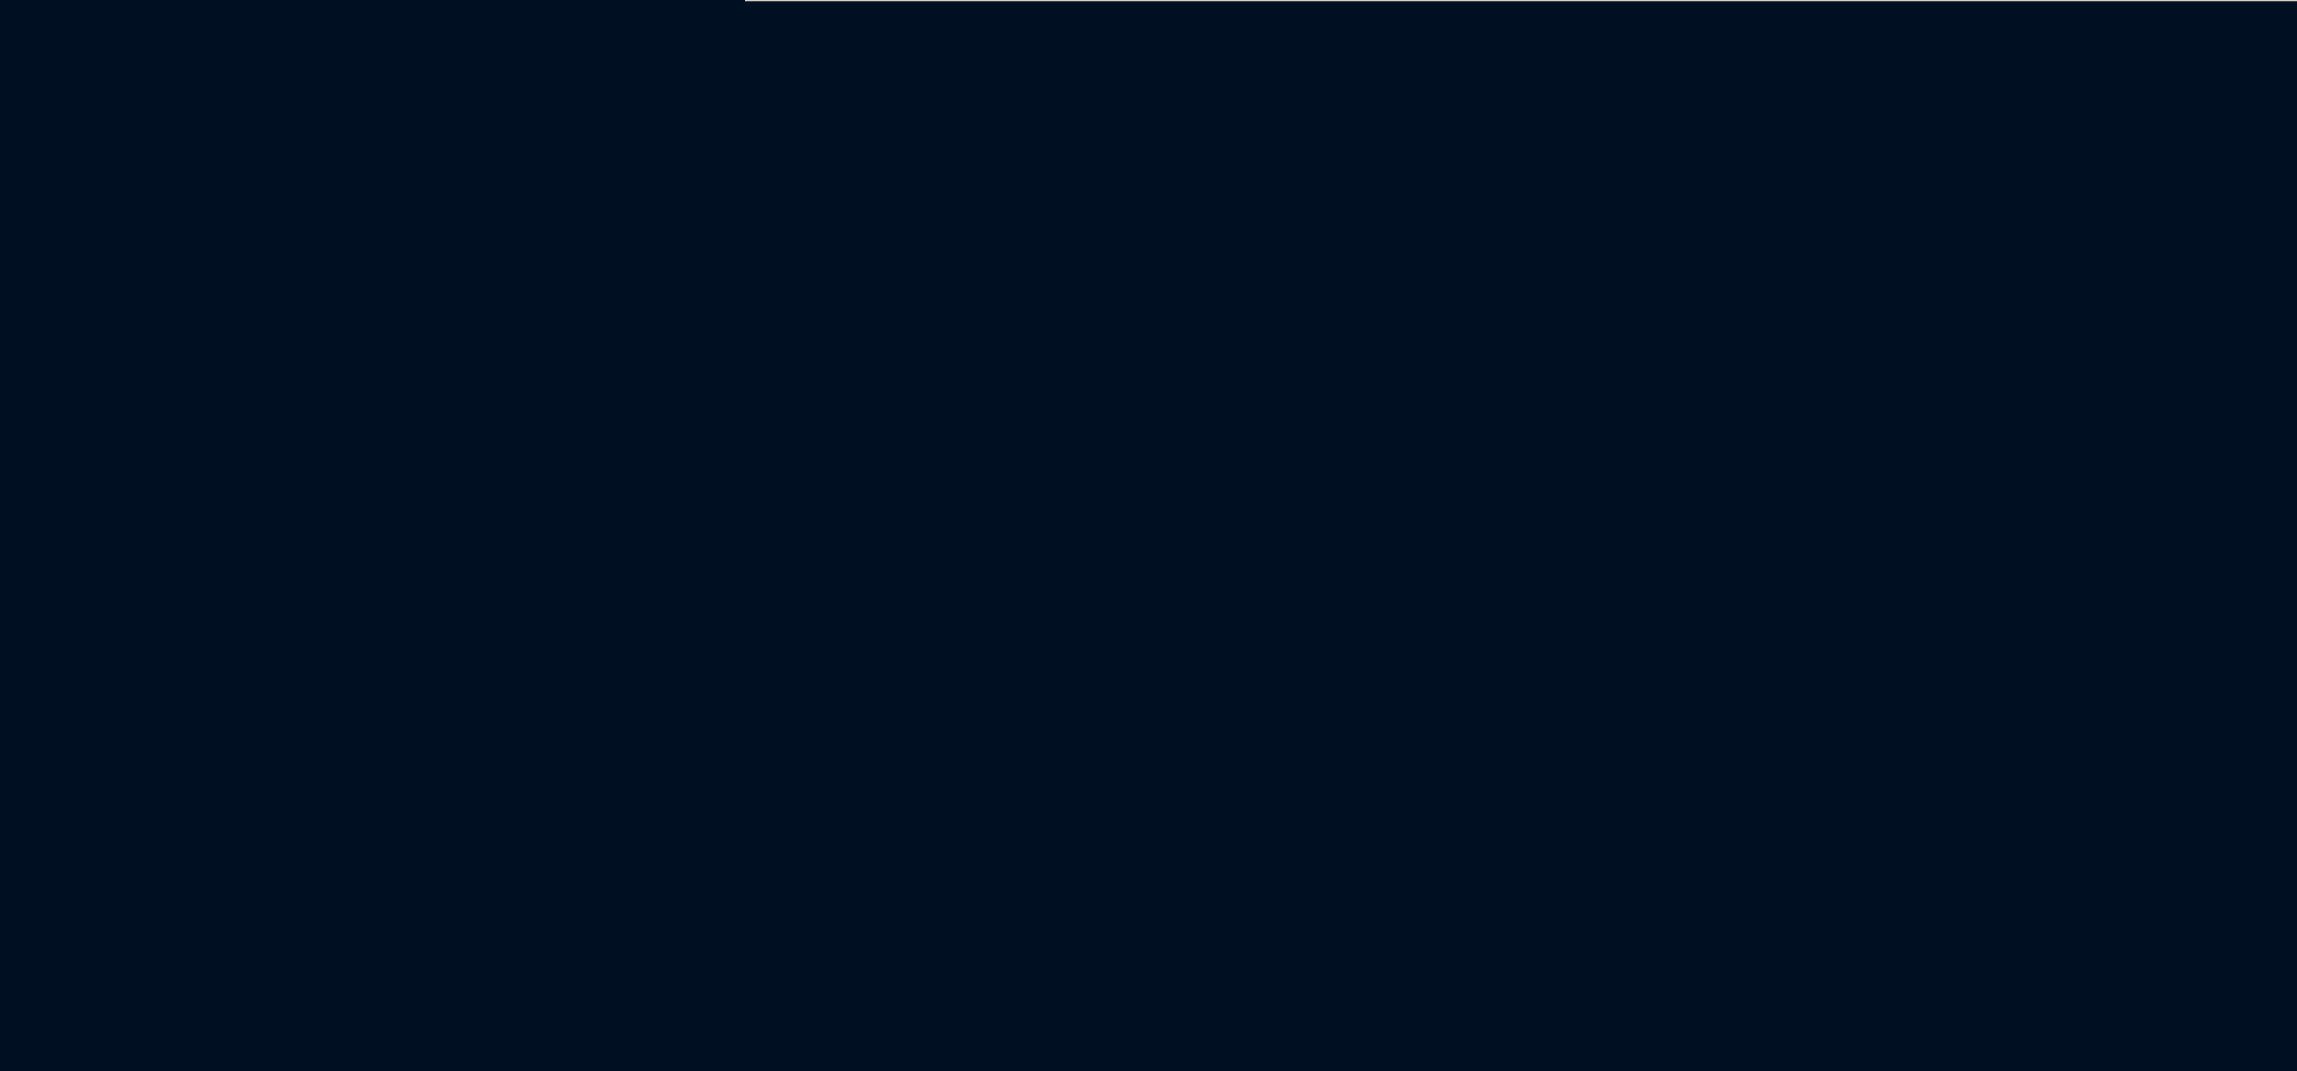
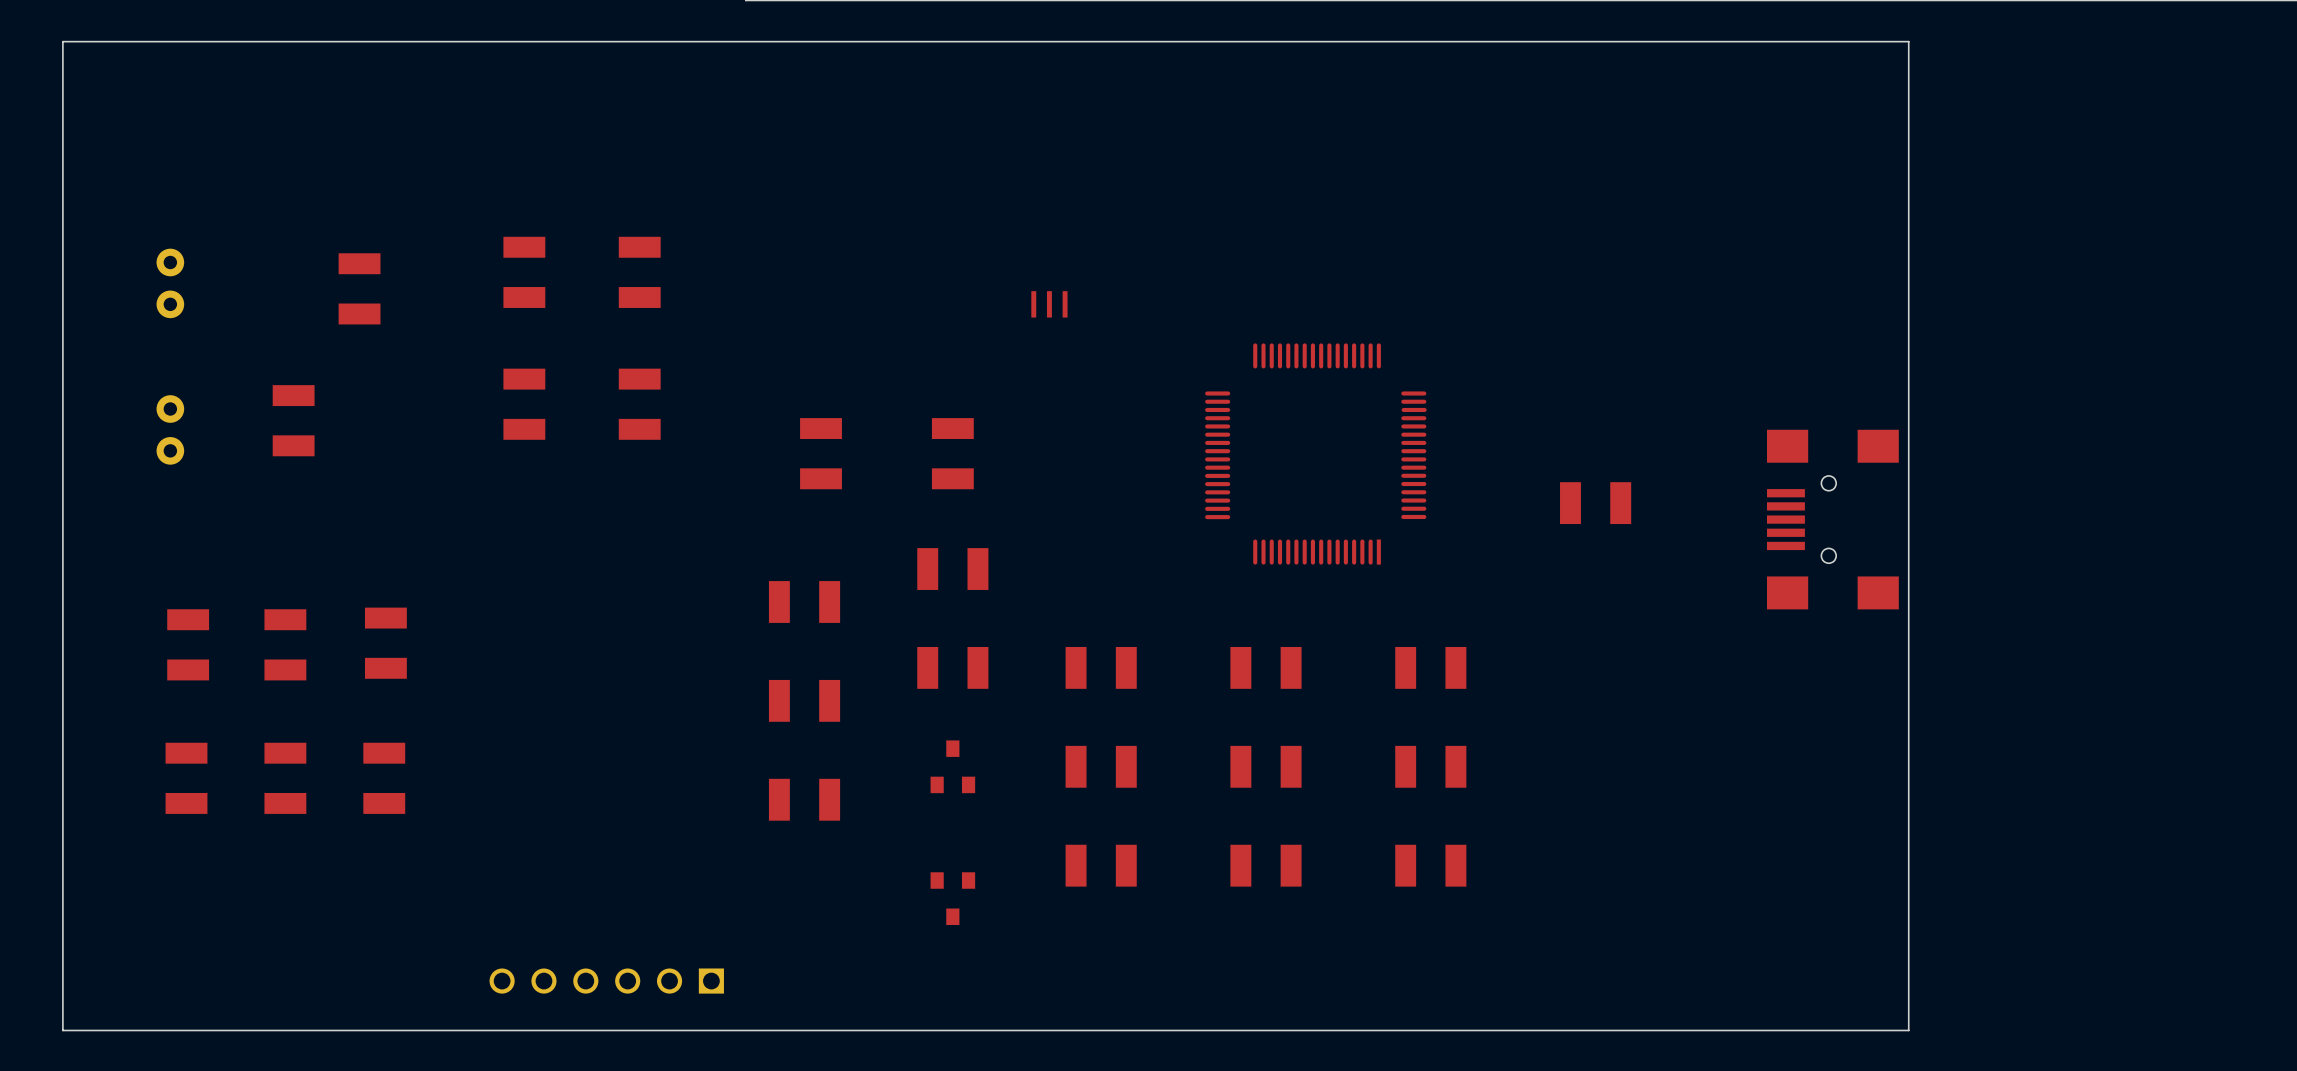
board edge: none -> (1908, 41) (1908, 1030) (62, 1030) (62, 41) (1908, 41)
part: none -> (524, 272)
part: none -> (639, 272)
part: none -> (170, 283)
part: none -> (359, 288)
part: none -> (1049, 304)
part: none -> (524, 404)
part: none -> (639, 404)
part: none -> (293, 420)
part: none -> (170, 429)
part: none -> (821, 453)
part: none -> (952, 453)
part: none -> (1315, 453)
part: none -> (1595, 503)
part: none -> (1832, 519)
part: none -> (952, 569)
part: none -> (804, 601)
part: none -> (385, 643)
part: none -> (188, 644)
part: none -> (285, 644)
part: none -> (952, 667)
part: none -> (1101, 667)
part: none -> (1265, 667)
part: none -> (1430, 667)
part: none -> (804, 700)
part: none -> (952, 766)
part: none -> (1101, 766)
part: none -> (1265, 766)
part: none -> (1430, 766)
part: none -> (186, 778)
part: none -> (285, 778)
part: none -> (384, 778)
part: none -> (804, 799)
part: none -> (1101, 865)
part: none -> (1265, 865)
part: none -> (1430, 865)
part: none -> (952, 898)
part: none -> (606, 981)

